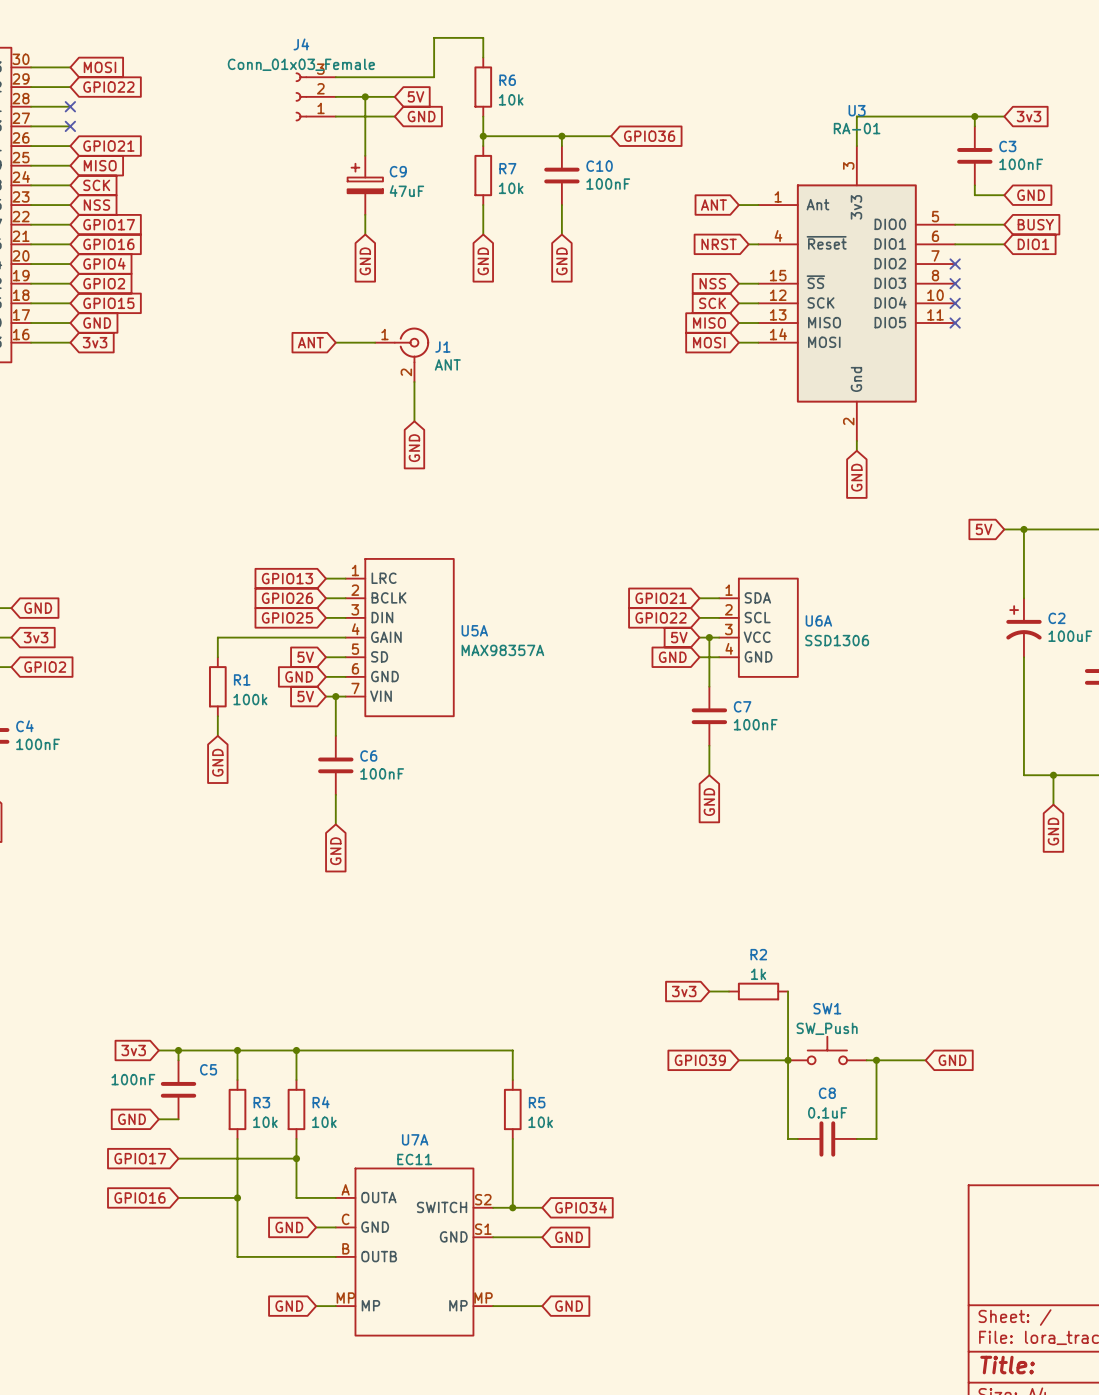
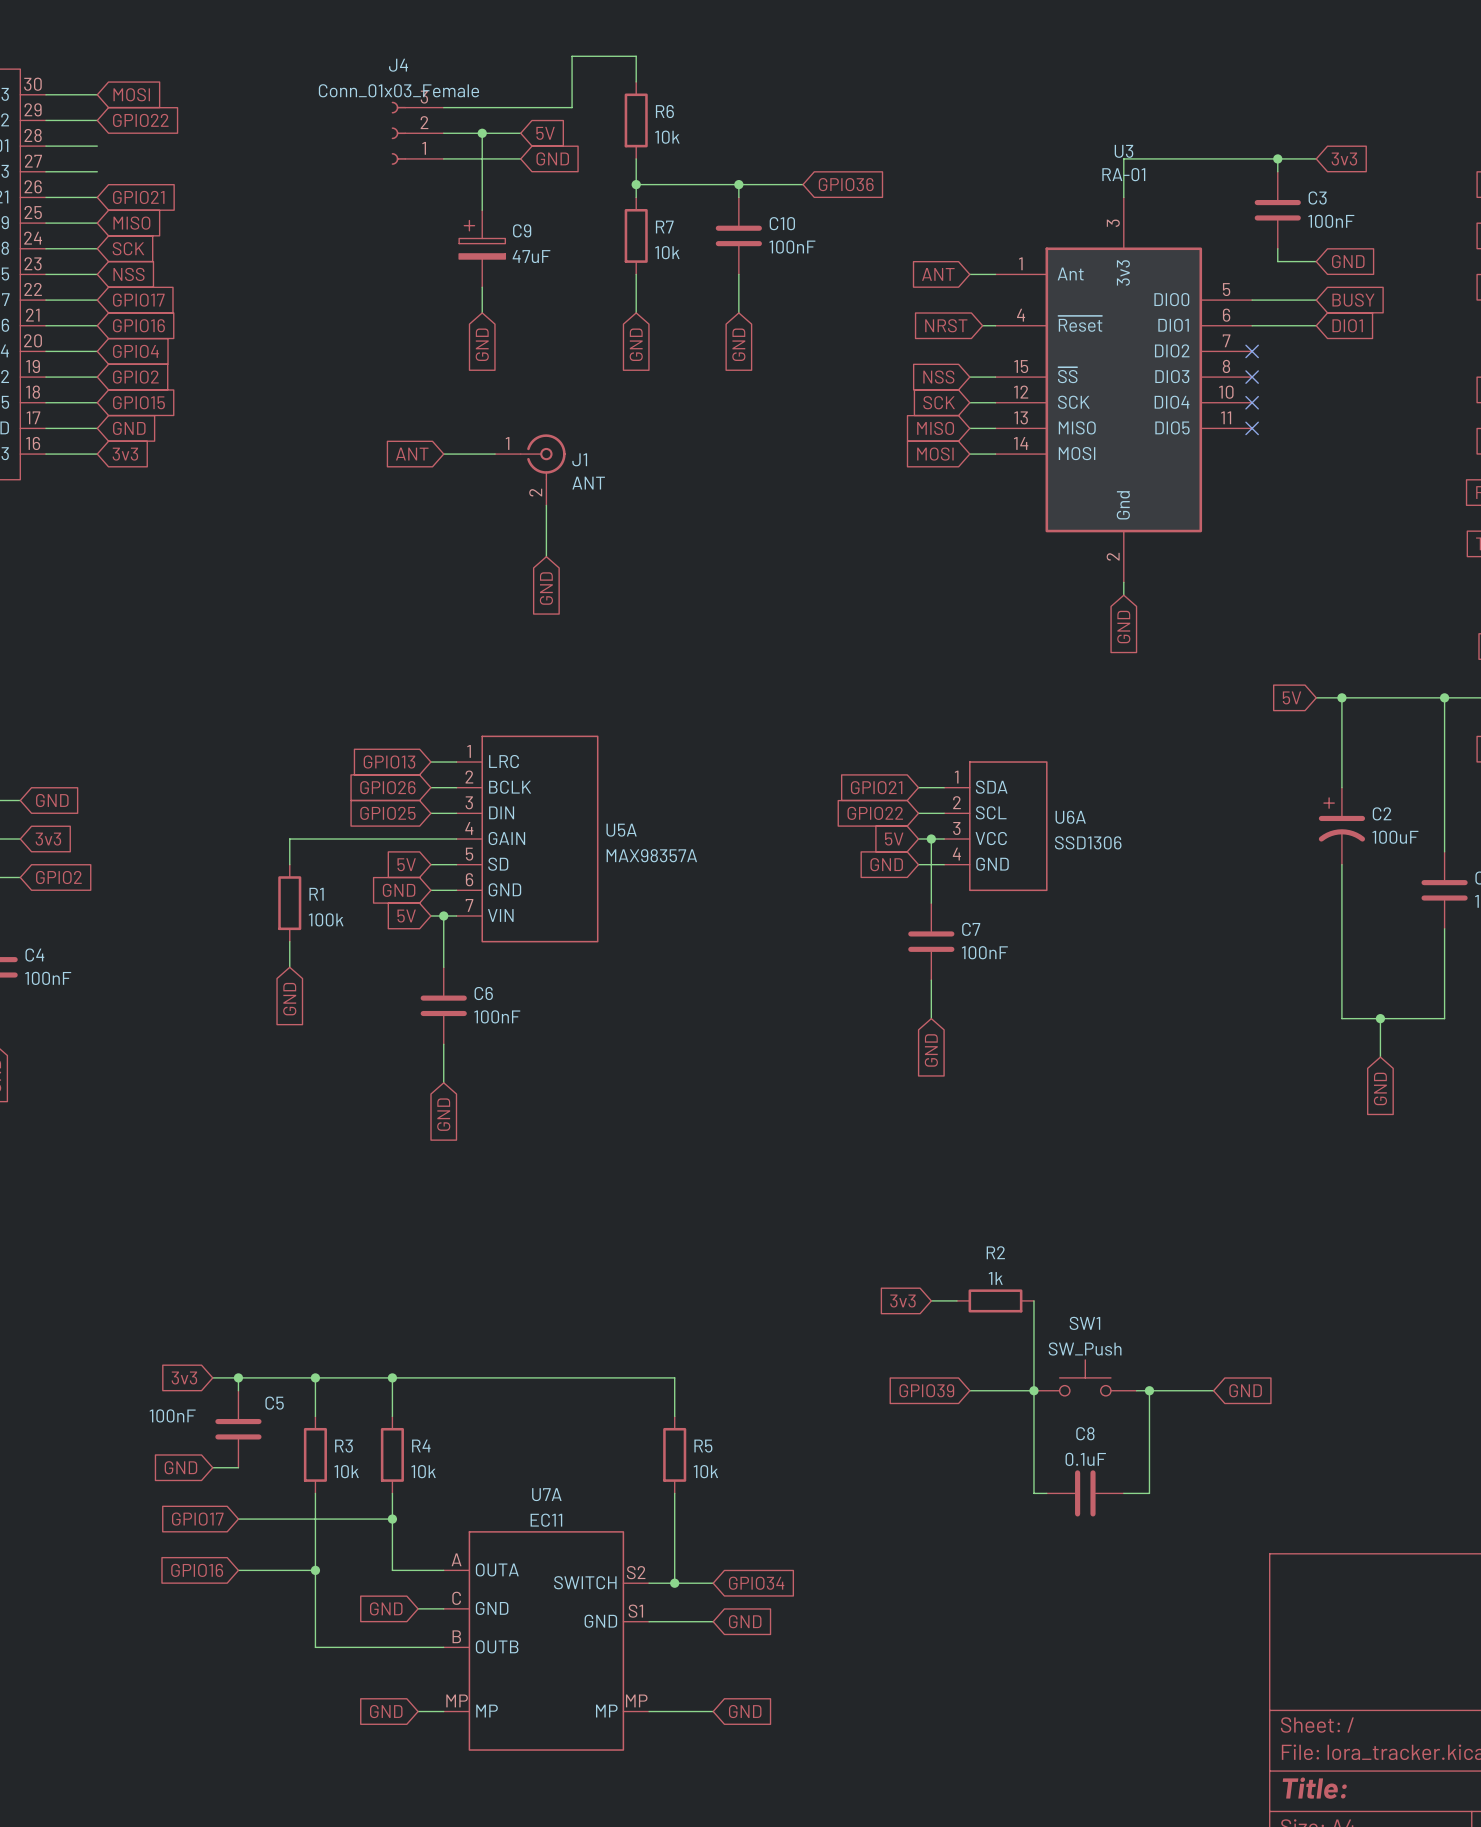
no-connect mark: (70, 106) -> none
no-connect mark: (70, 126) -> none

